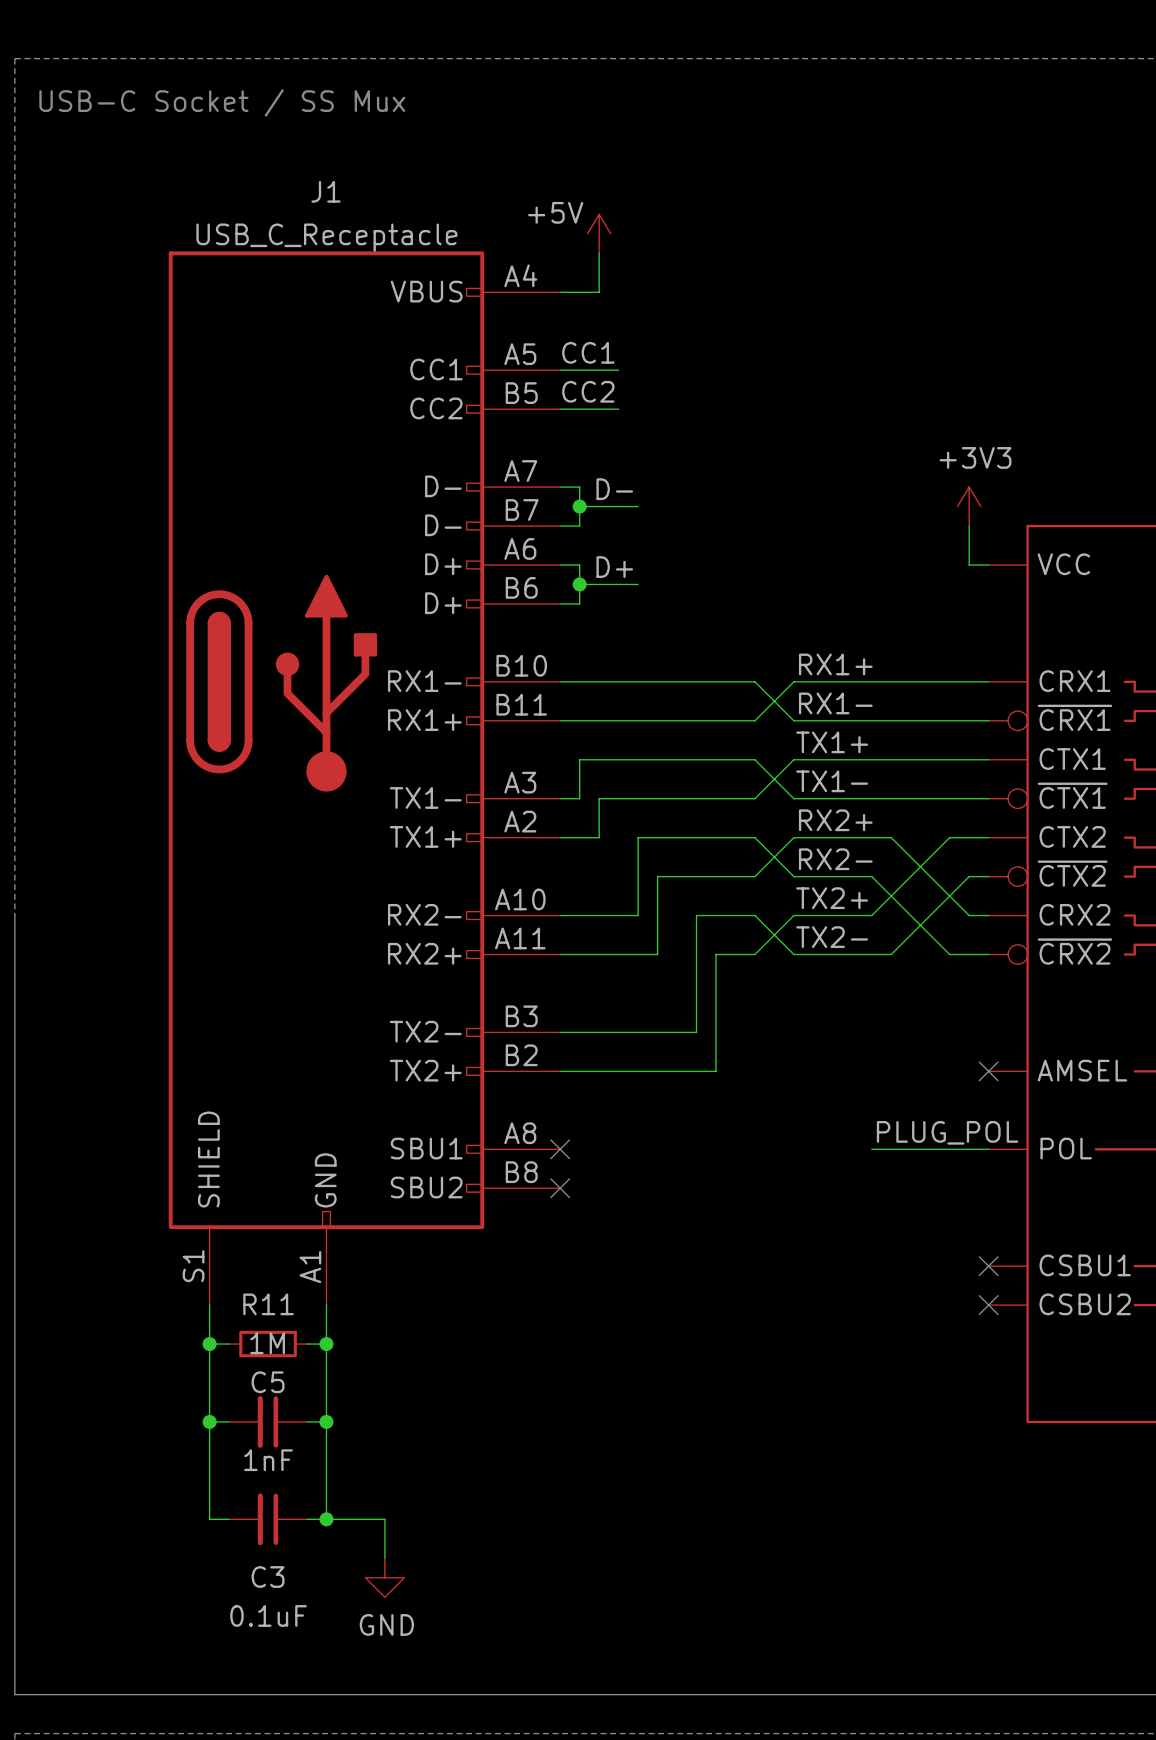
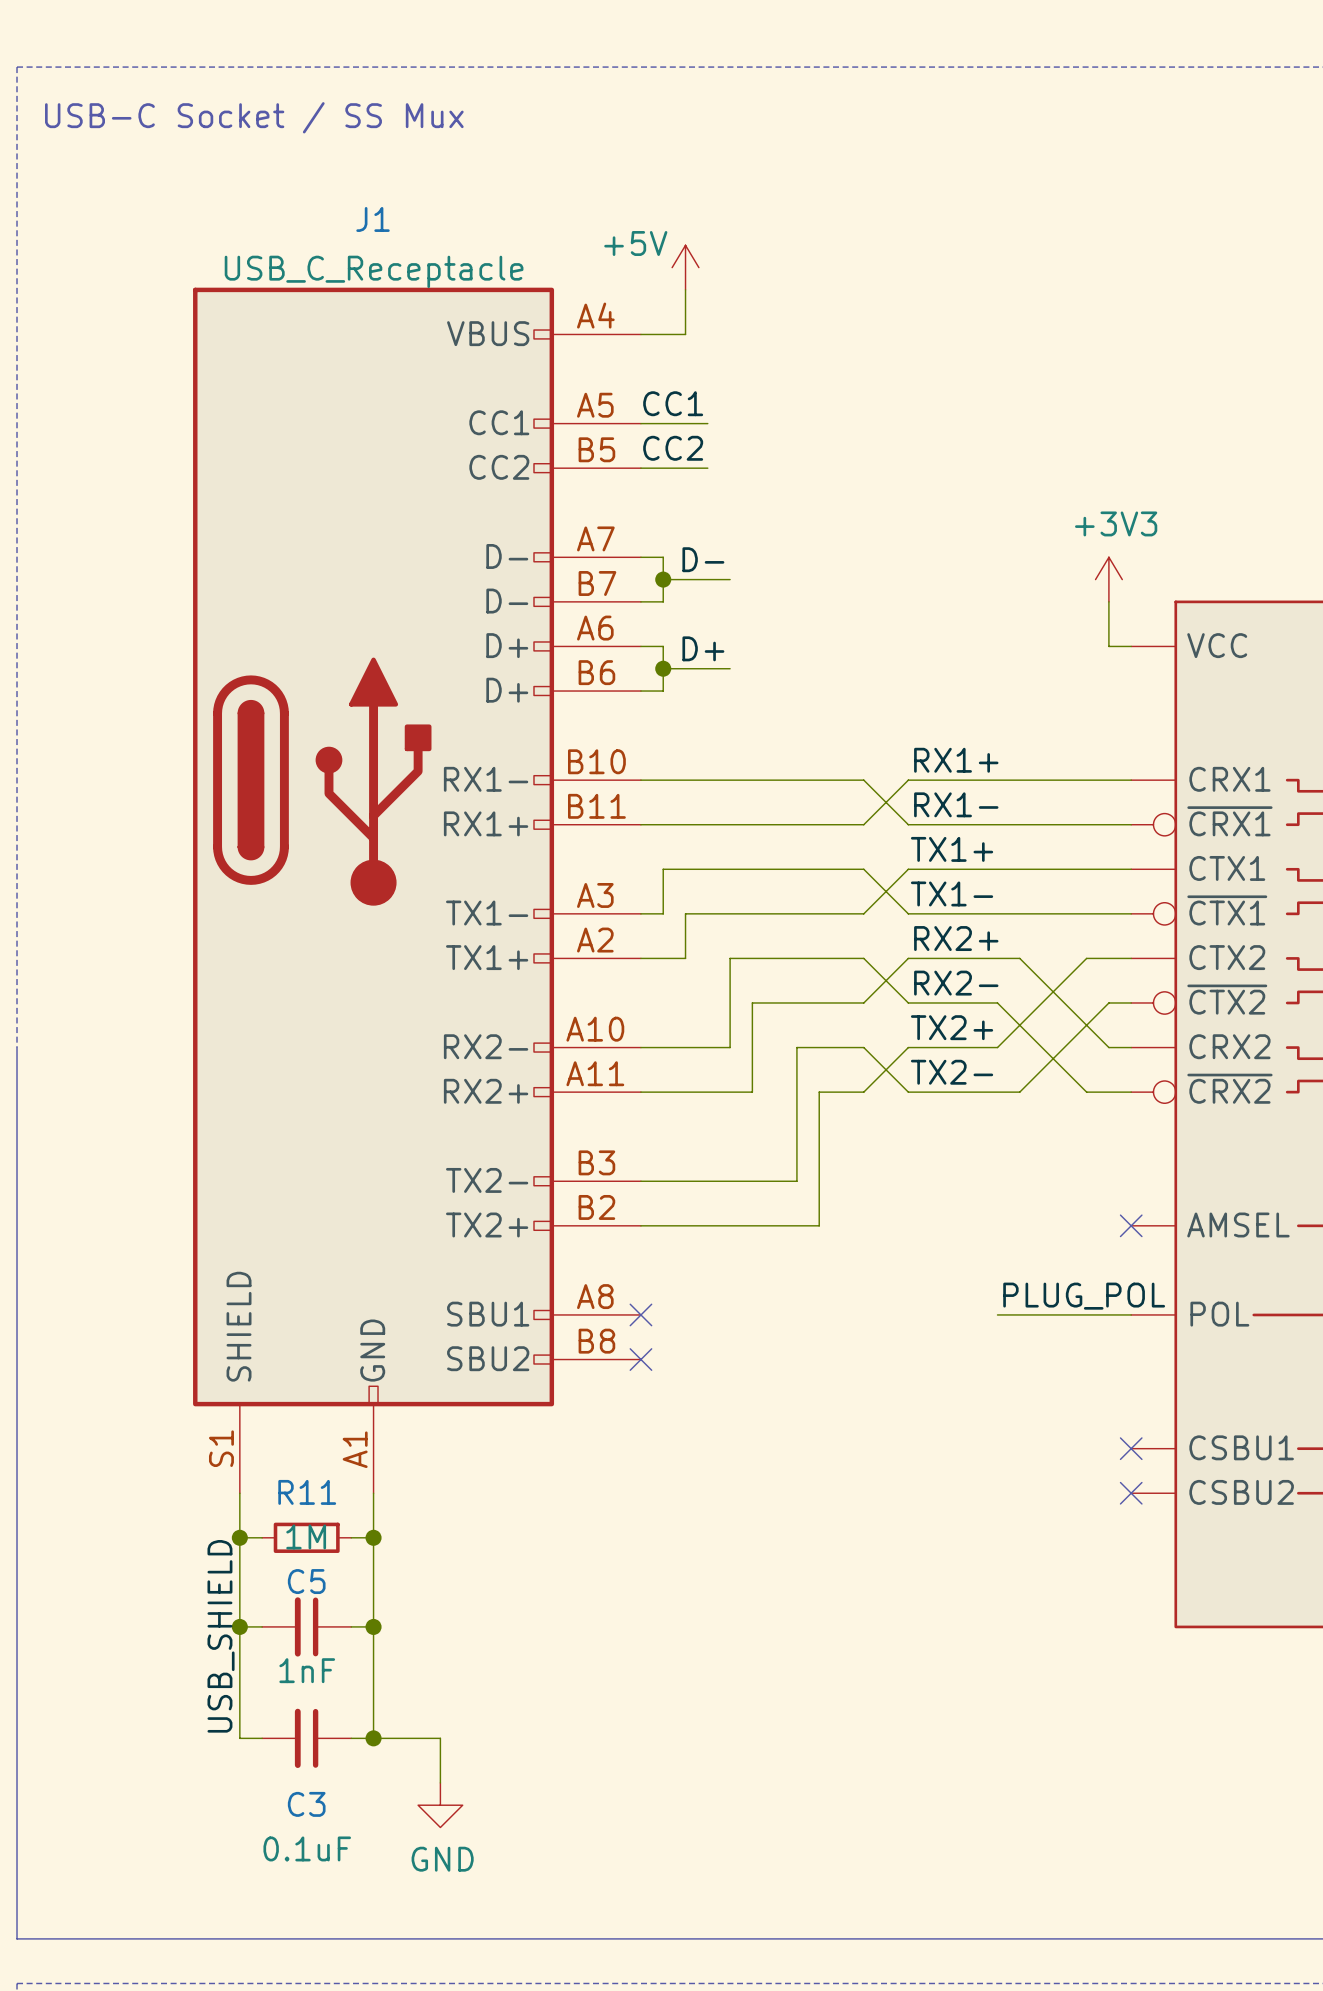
label: none -> USB_SHIELD (221, 1636)

